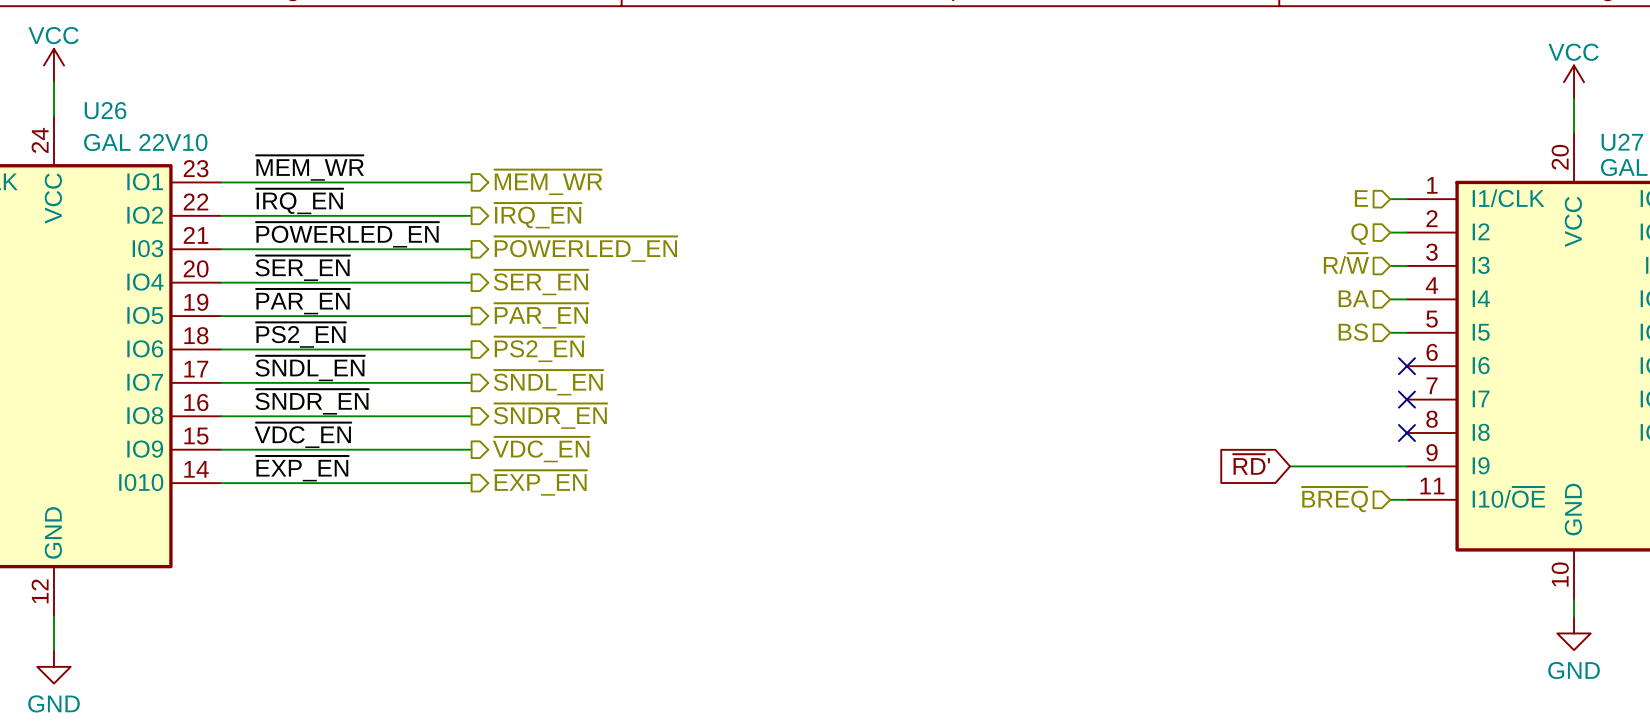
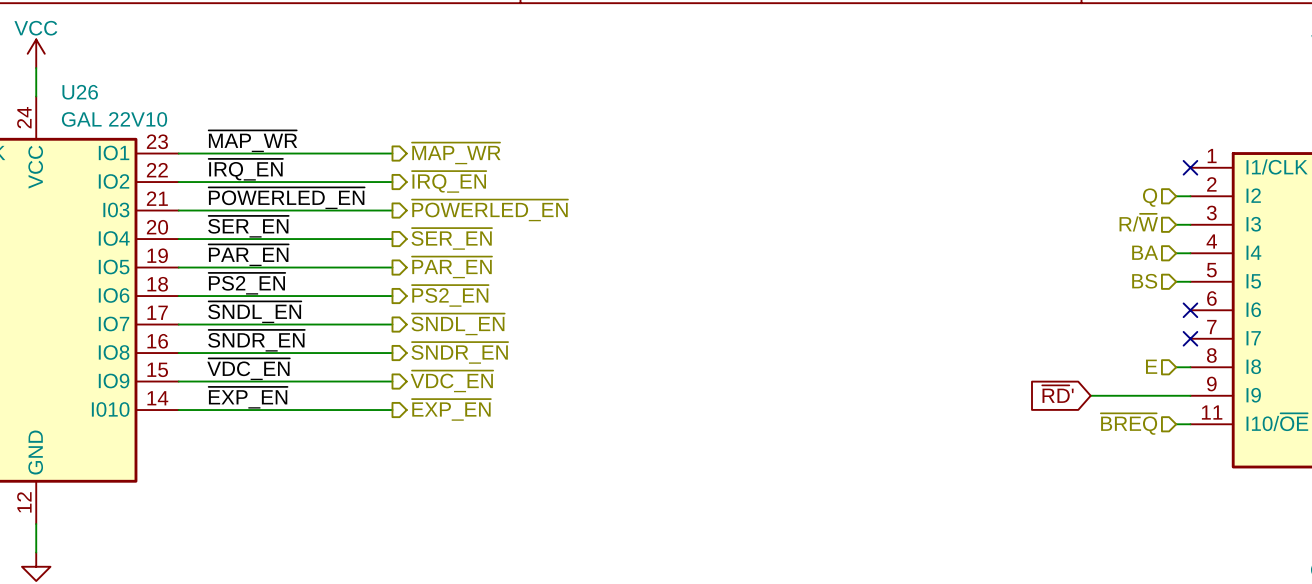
label: ~{MEM_WR} (310, 168) -> ~{MAP_WR} (252, 141)
hierarchical label: ~{MEM_WR} (548, 182) -> ~{MAP_WR} (456, 153)
hierarchical label position: E (1361, 198) -> E (1151, 366)
wire: (1390, 199) (1406, 199) -> (1176, 367) (1190, 367)
no-connect mark: none -> (1190, 167)
no-connect mark: (1406, 433) -> none

